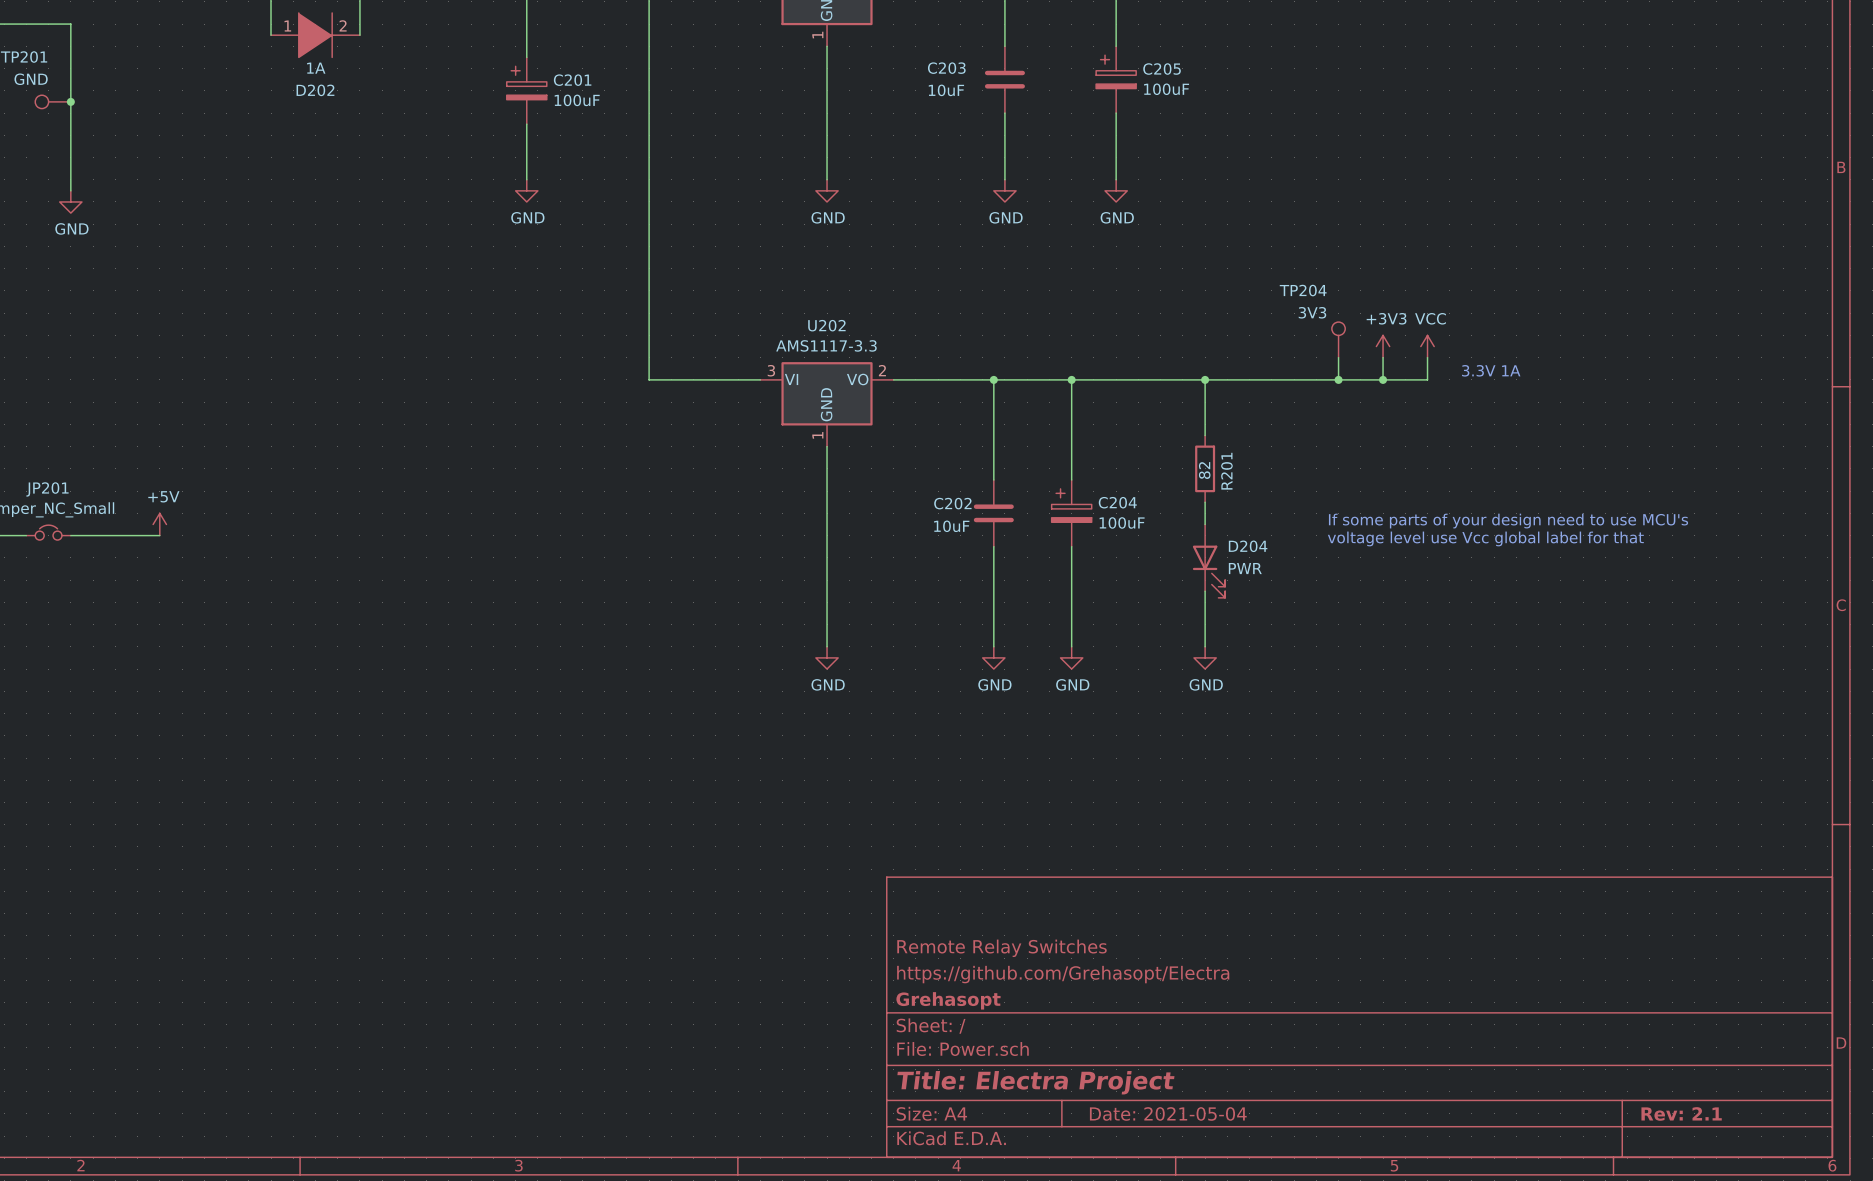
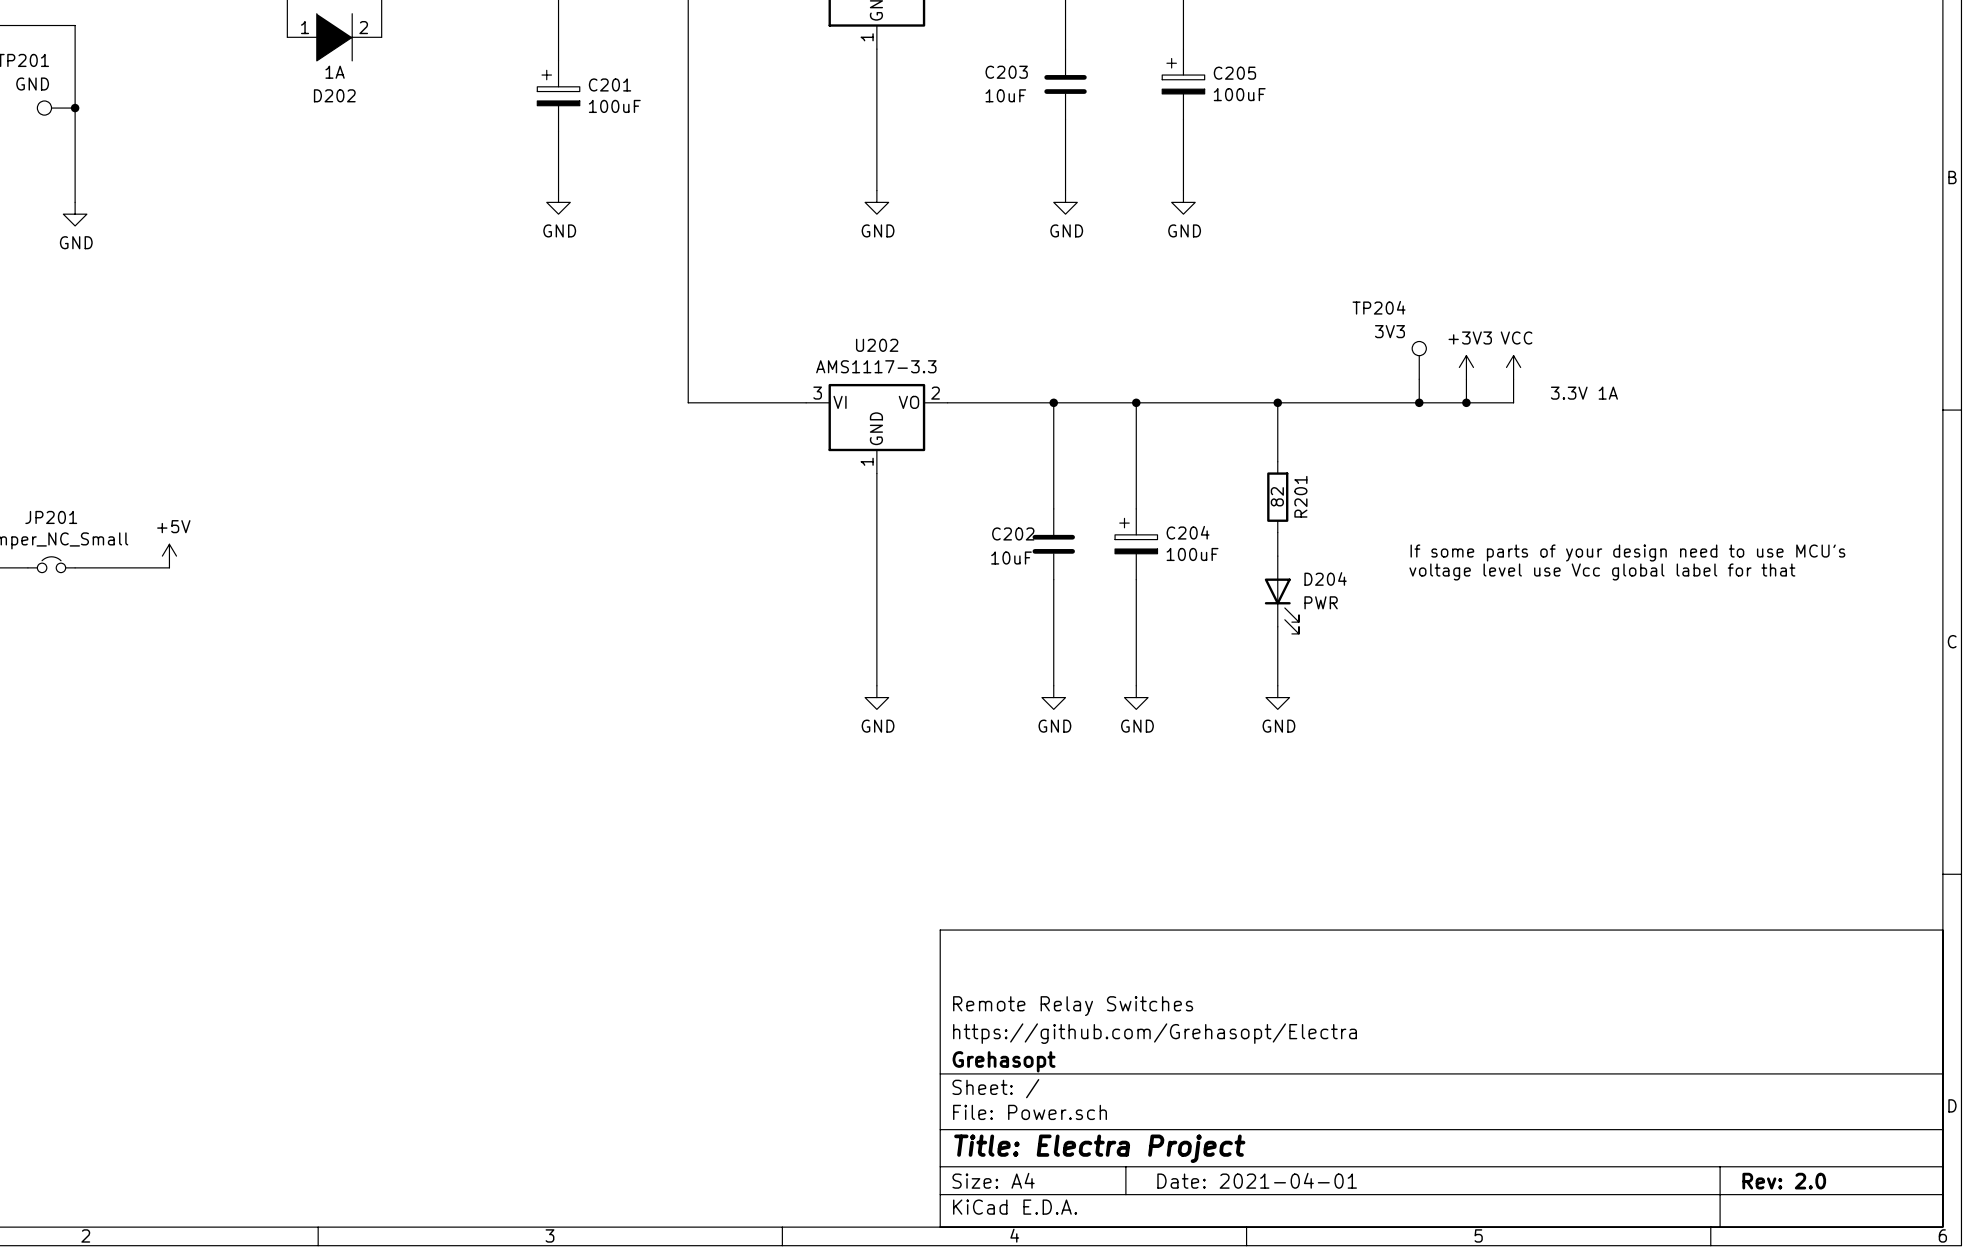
title block: Date: 2021-05-04 (1168, 1113) -> Date: 2021-04-01 (1257, 1180)
title block: Rev: 2.1 (1681, 1113) -> Rev: 2.0 (1784, 1181)

